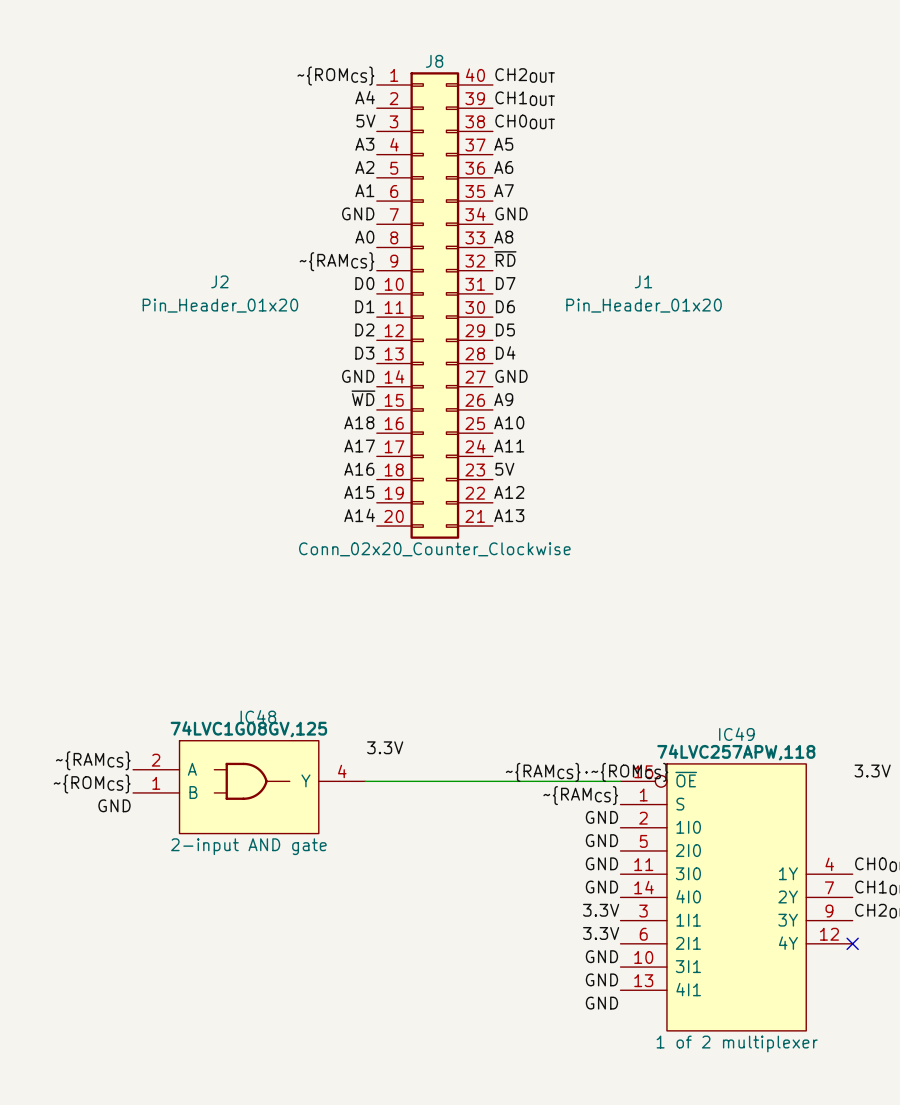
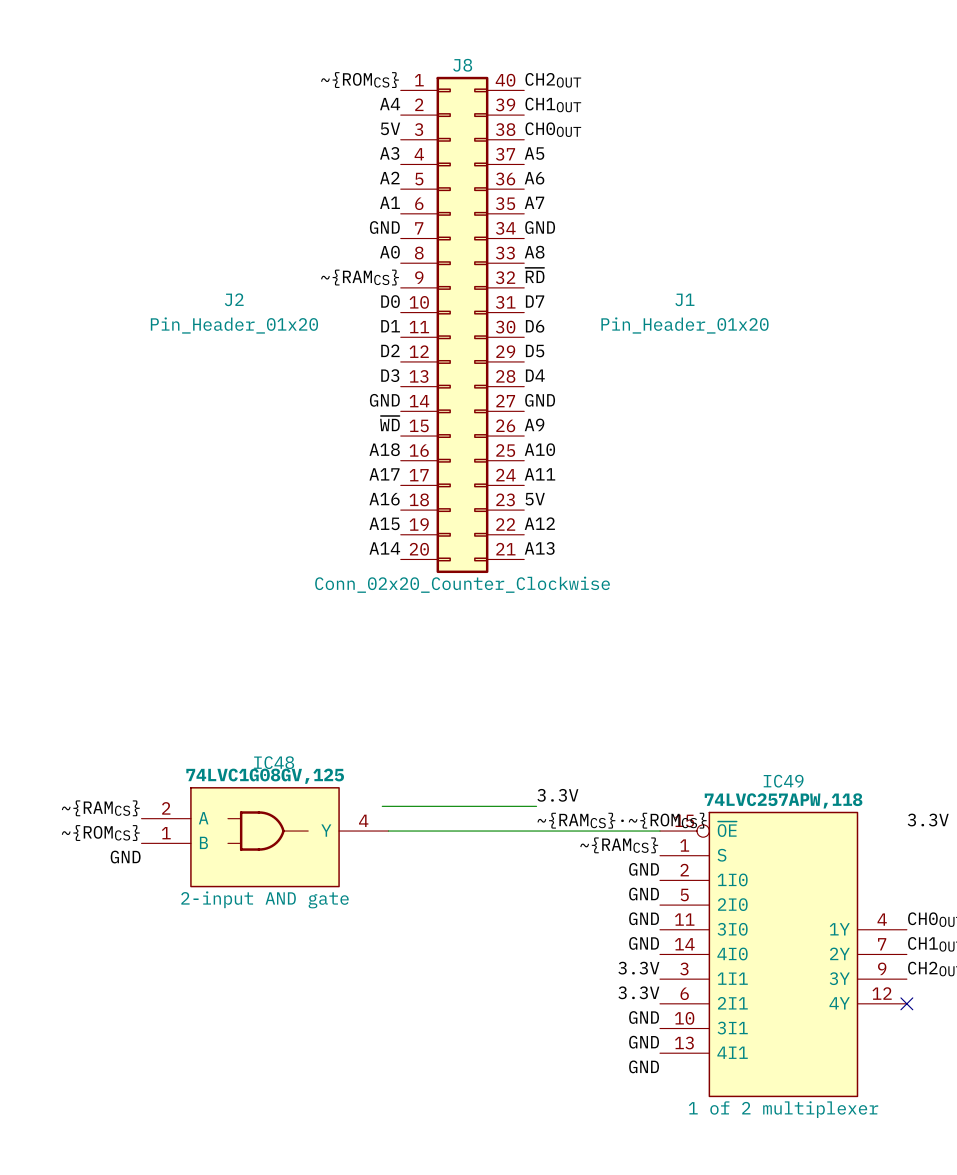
label position: 3.3V (385, 747) -> 3.3V (557, 795)
wire: none -> (382, 806) (536, 806)

